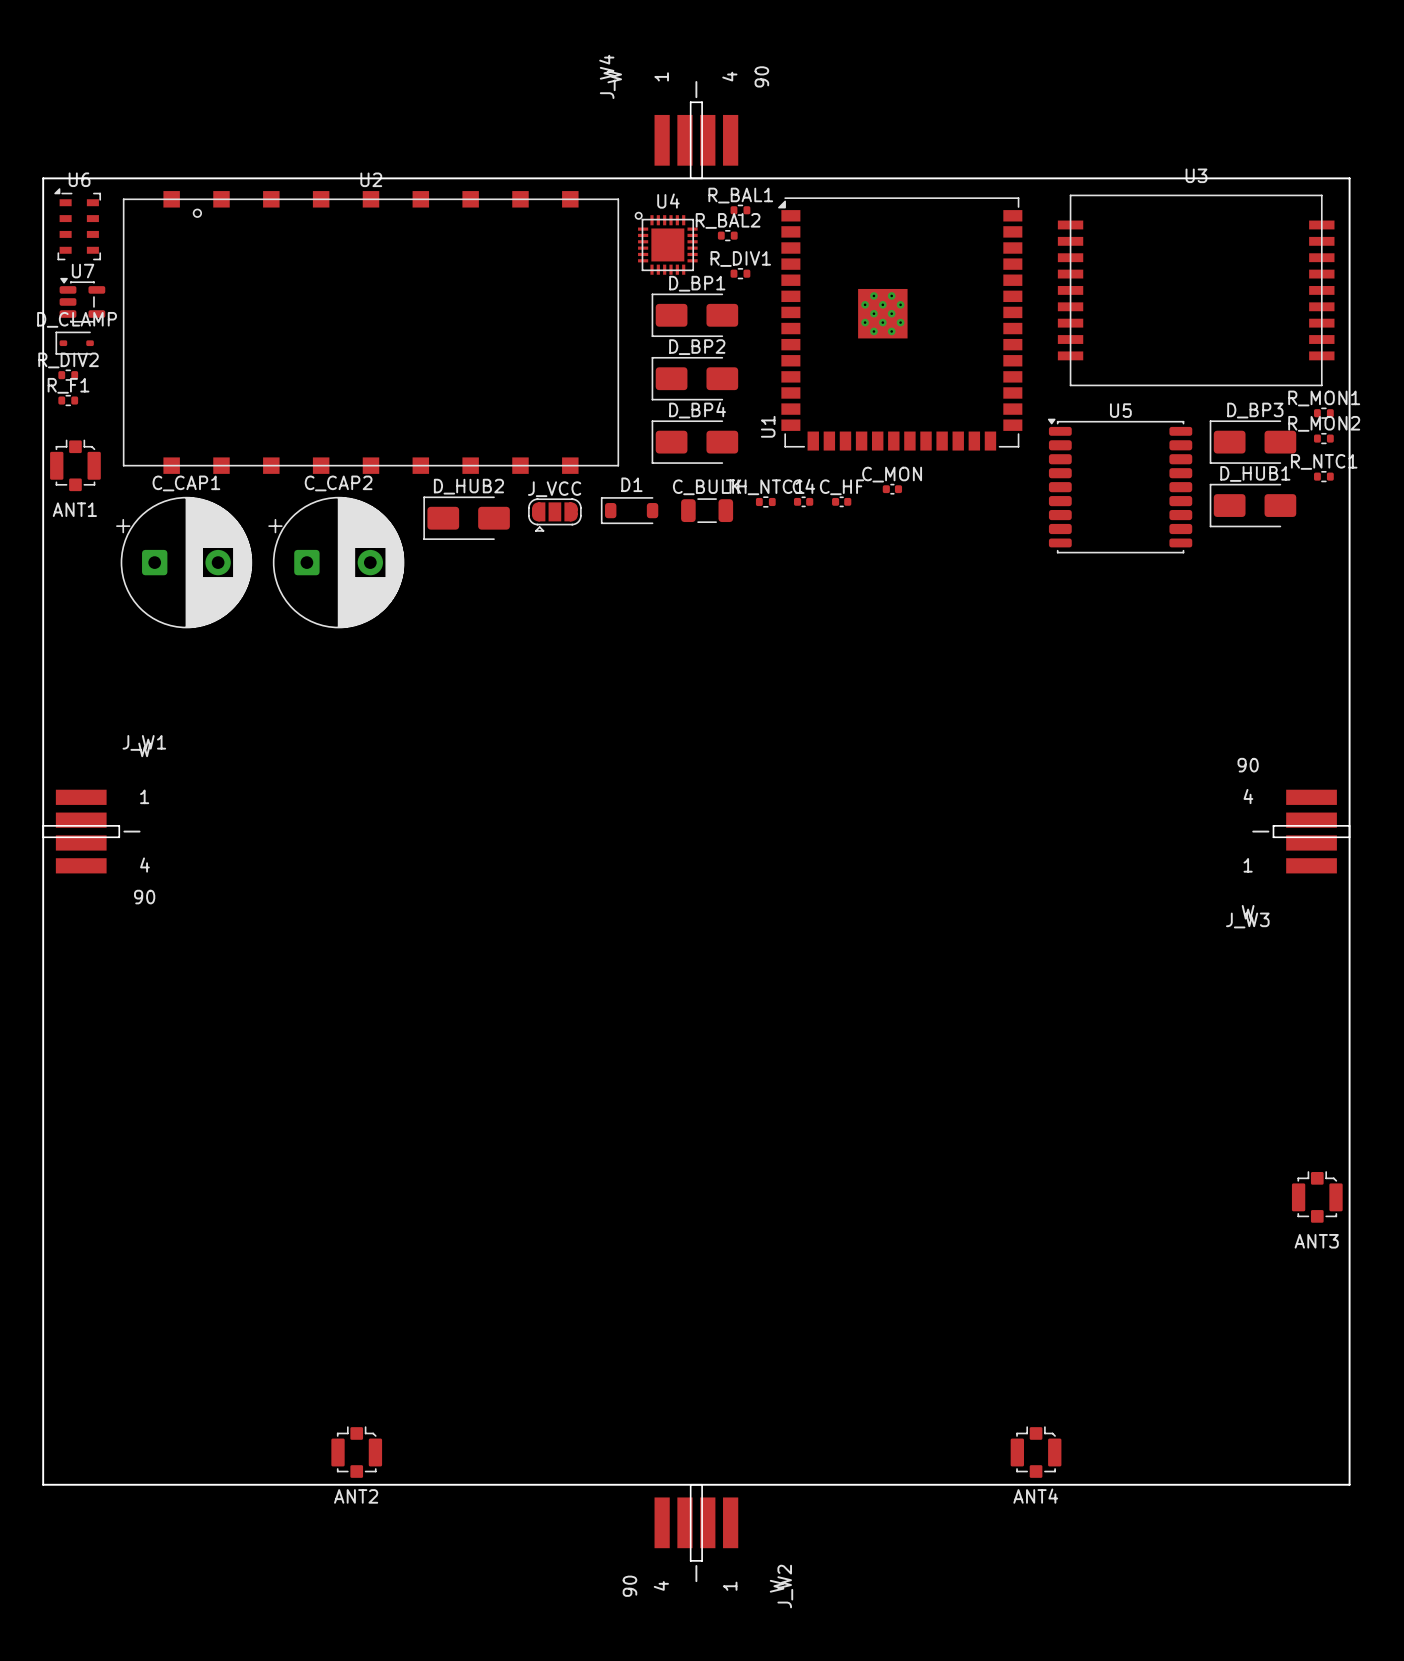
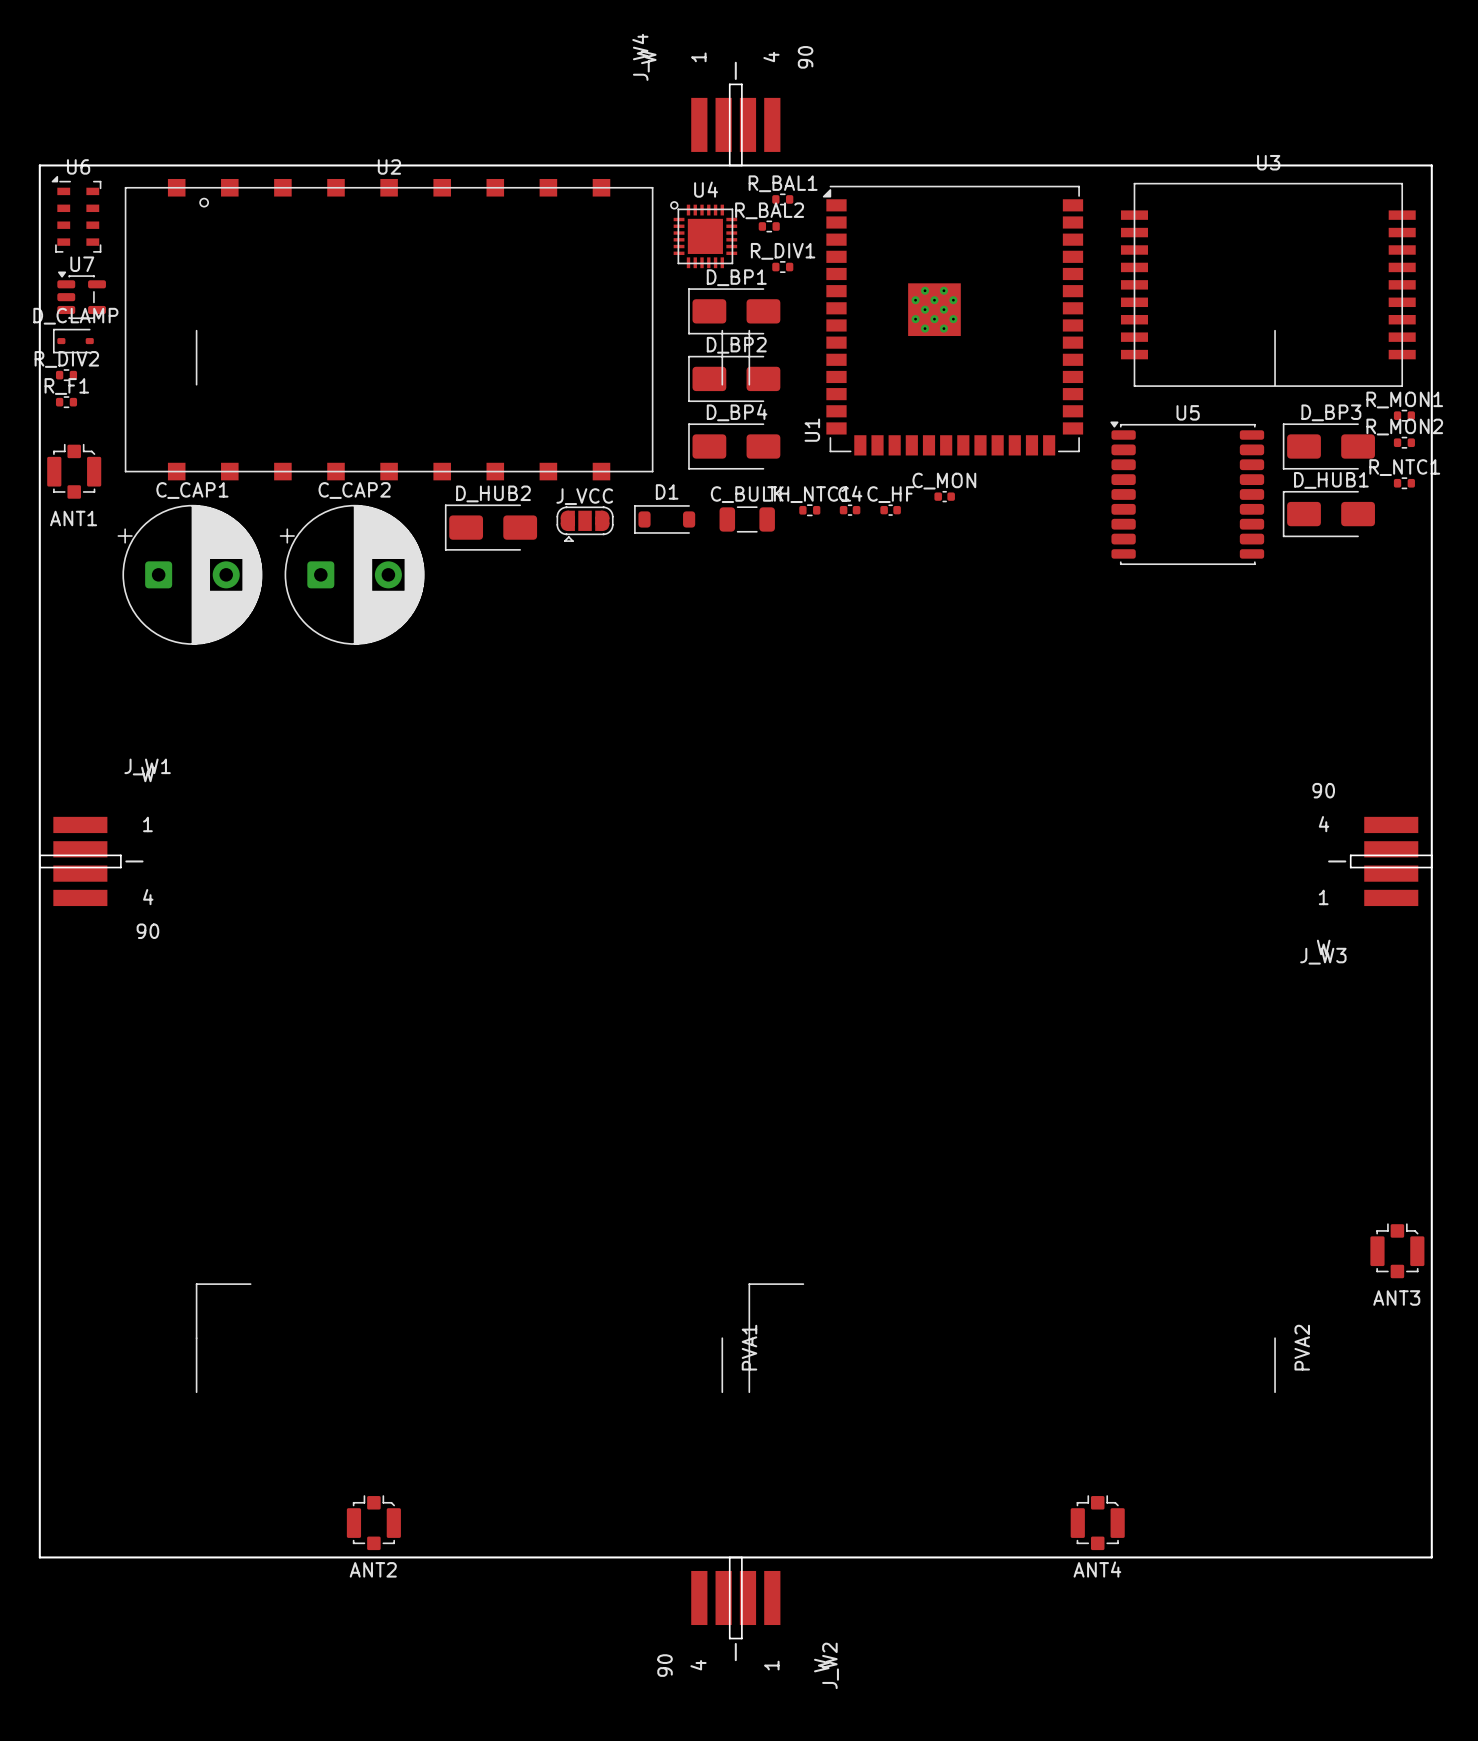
PVA1: none -> (459, 861)
PVA2: none -> (1012, 861)

